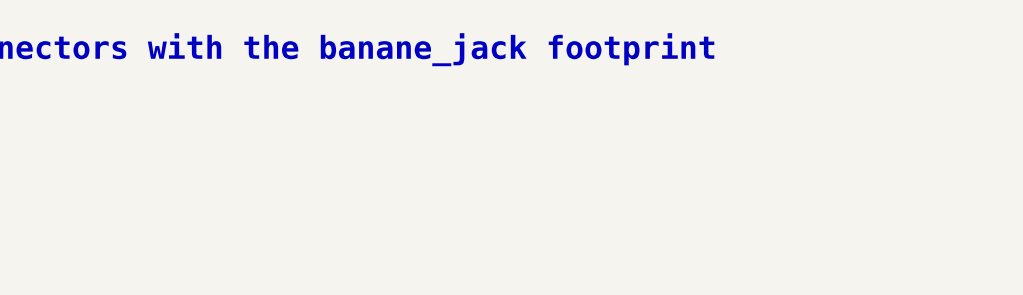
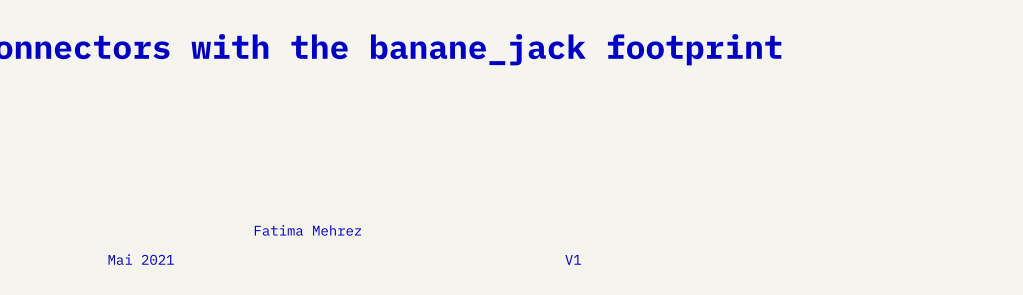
text: none -> Fatima Mehrez (307, 230)
text: none -> Mai 2021 (141, 259)
text: none -> V1 (573, 259)

